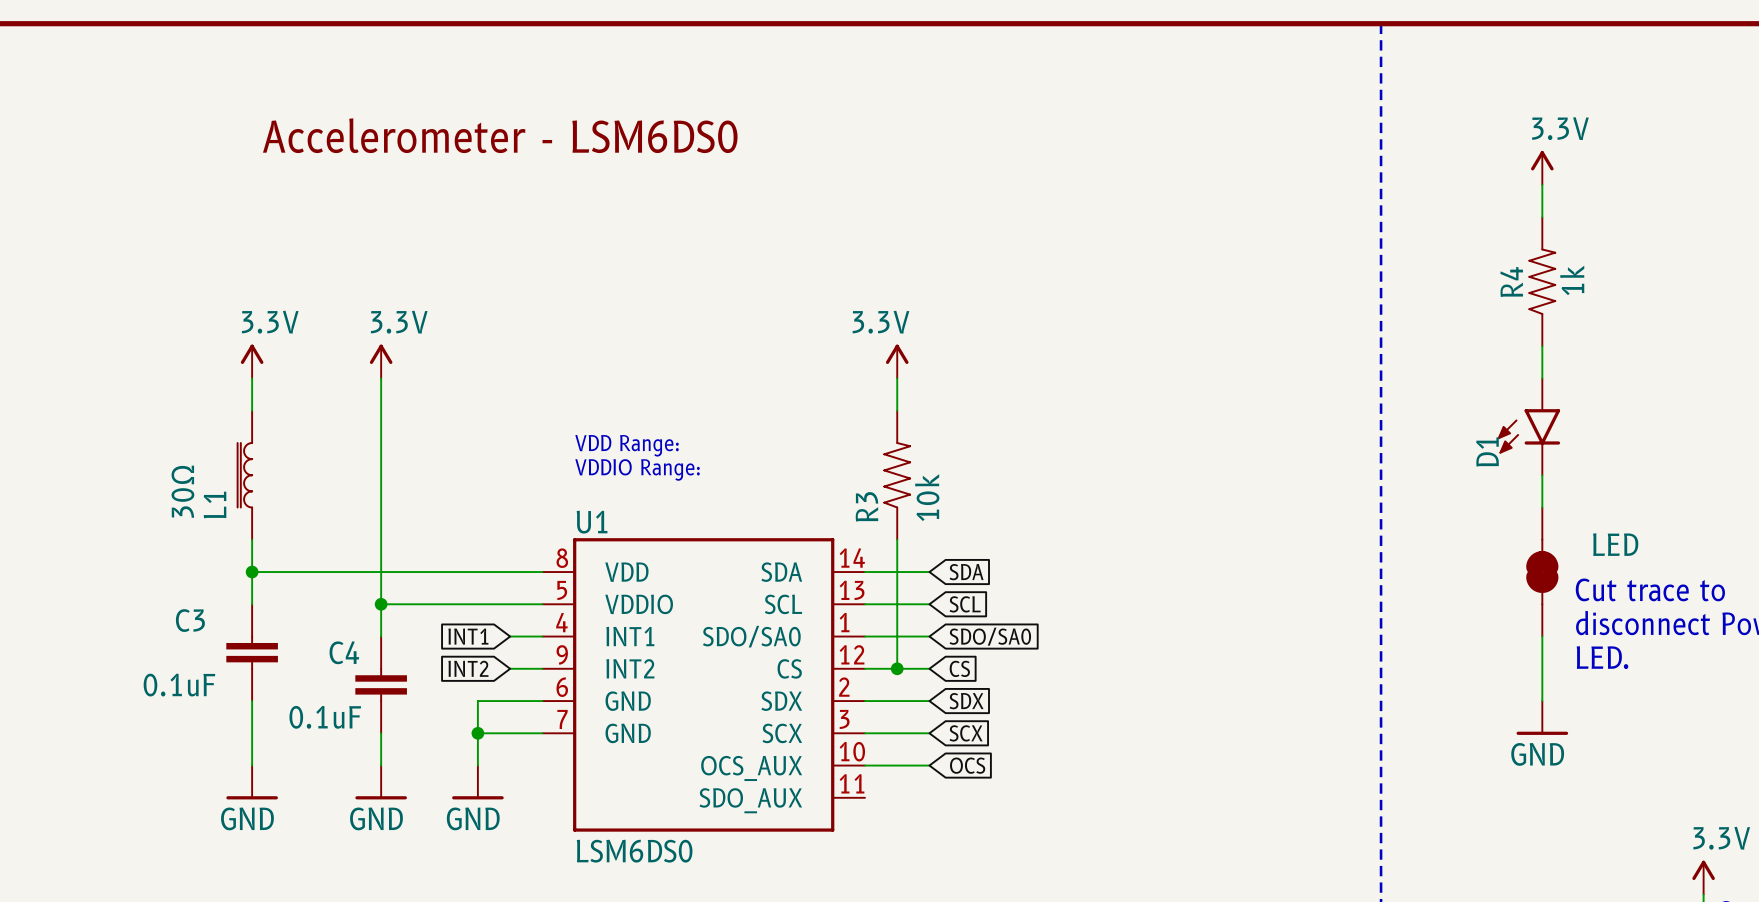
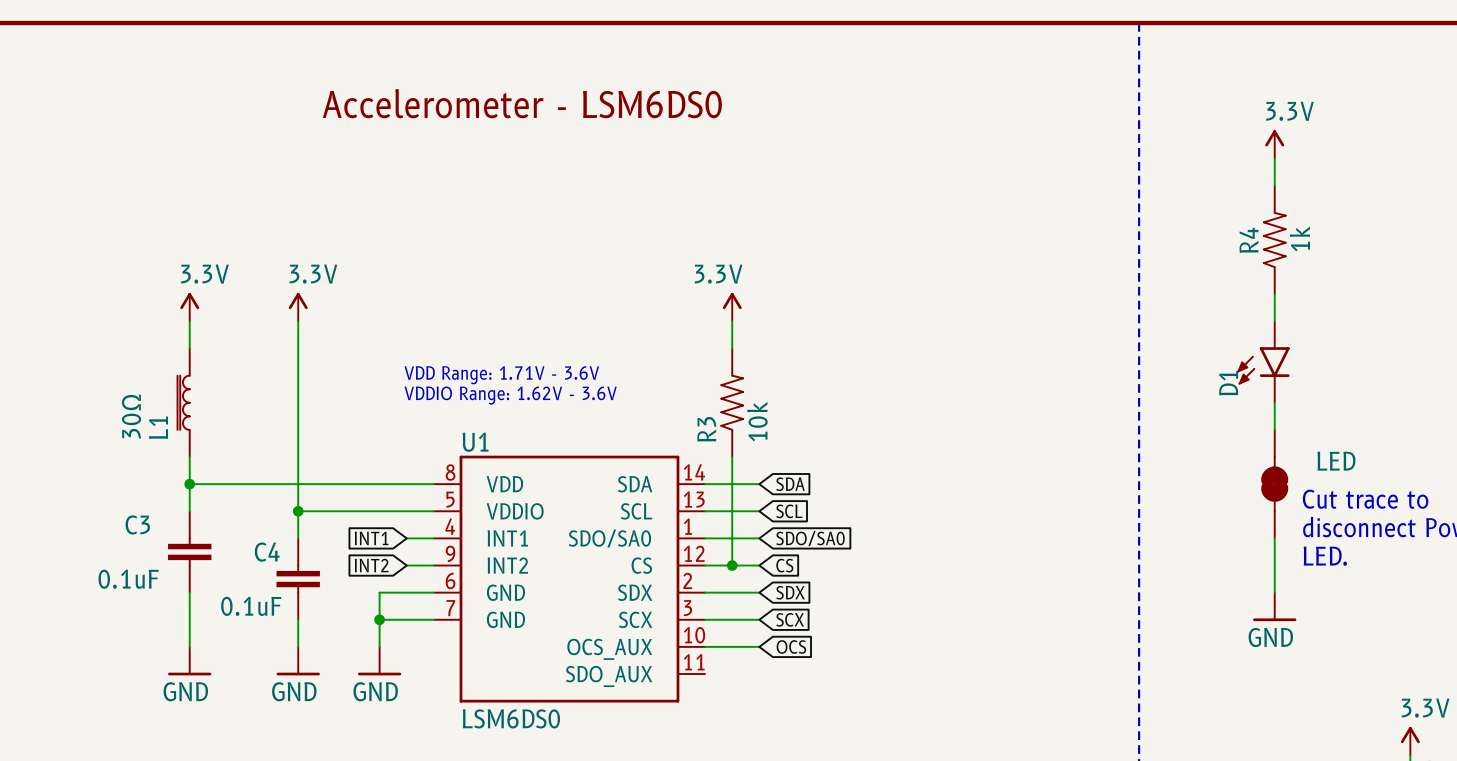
text: none -> Accelerometer - LSM6DS0 (522, 103)
text: Accelerometer - LSM6DS0 (500, 135) -> none
text: VDD Range: (627, 445) -> VDD Range: 1.71V - 3.6V (501, 375)
text: VDDIO Range: (637, 469) -> VDDIO Range: 1.62V - 3.6V (510, 395)

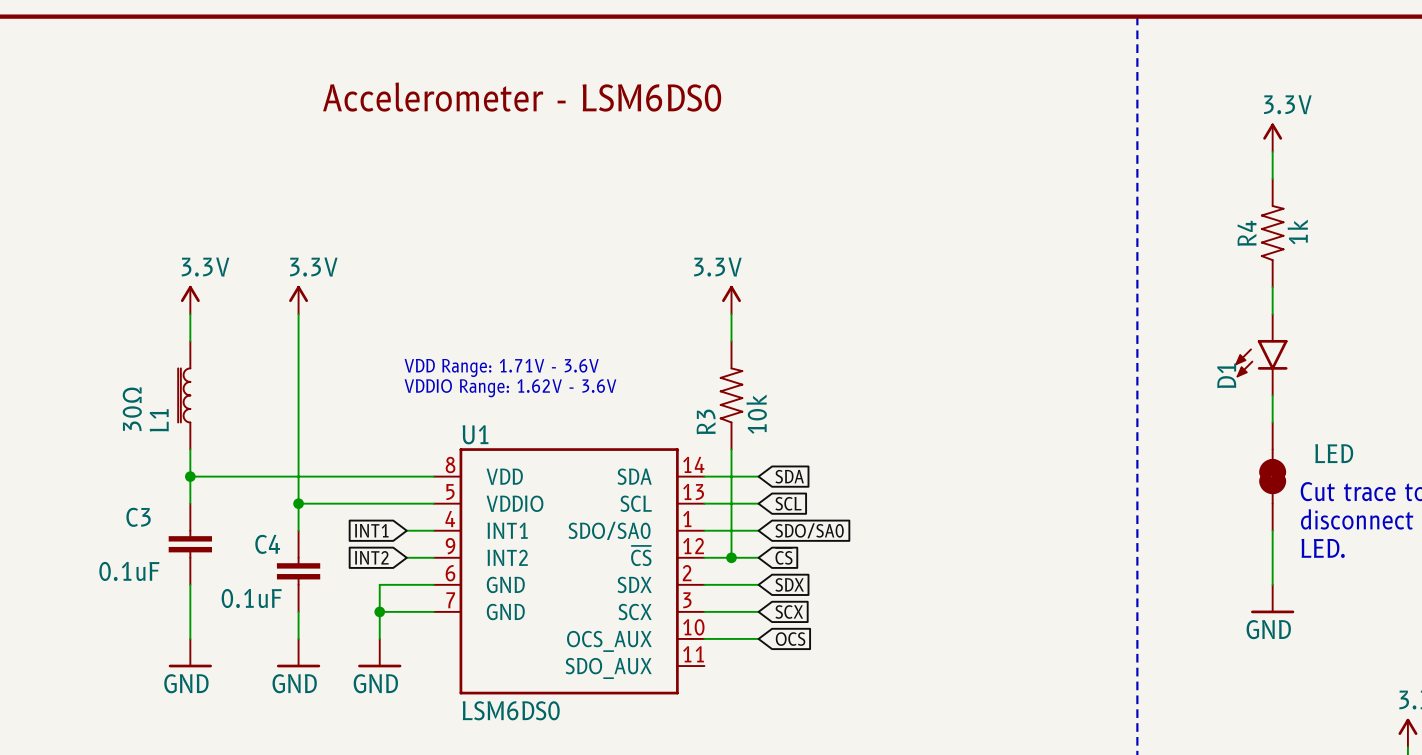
U1 pin name: CS (641, 565) -> ~{CS} (641, 556)
global label: CS (784, 565) -> ~{CS} (784, 556)

